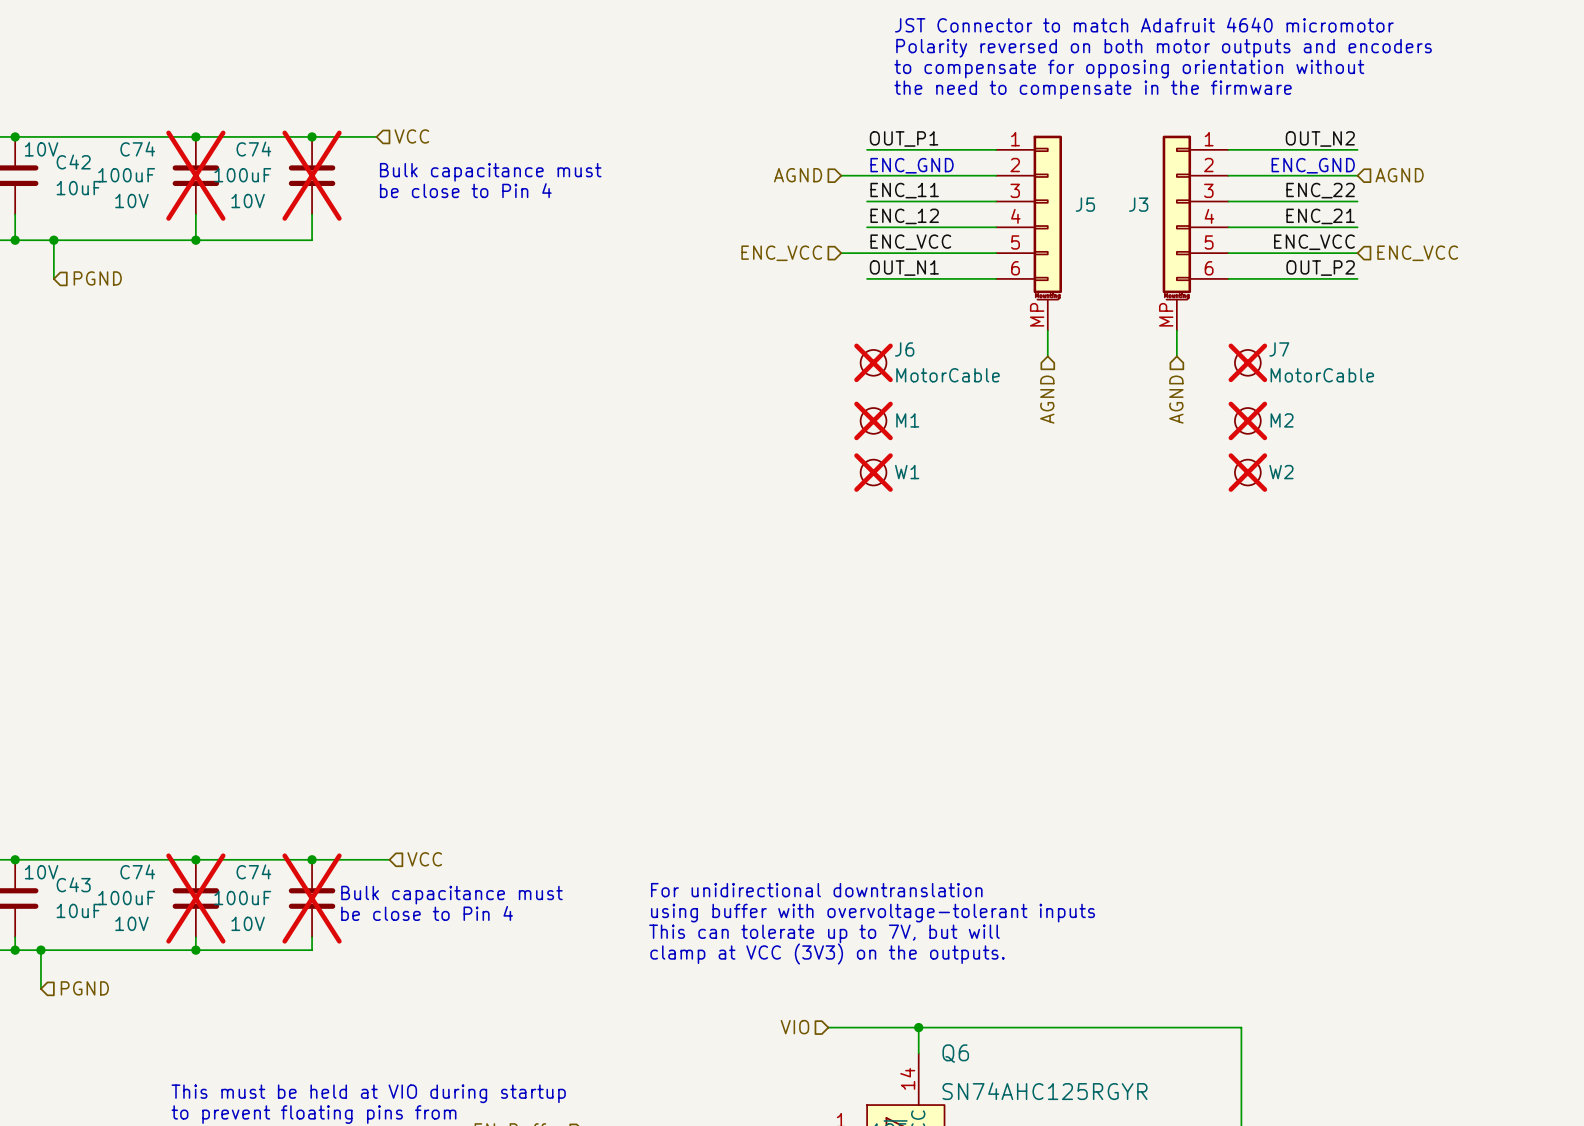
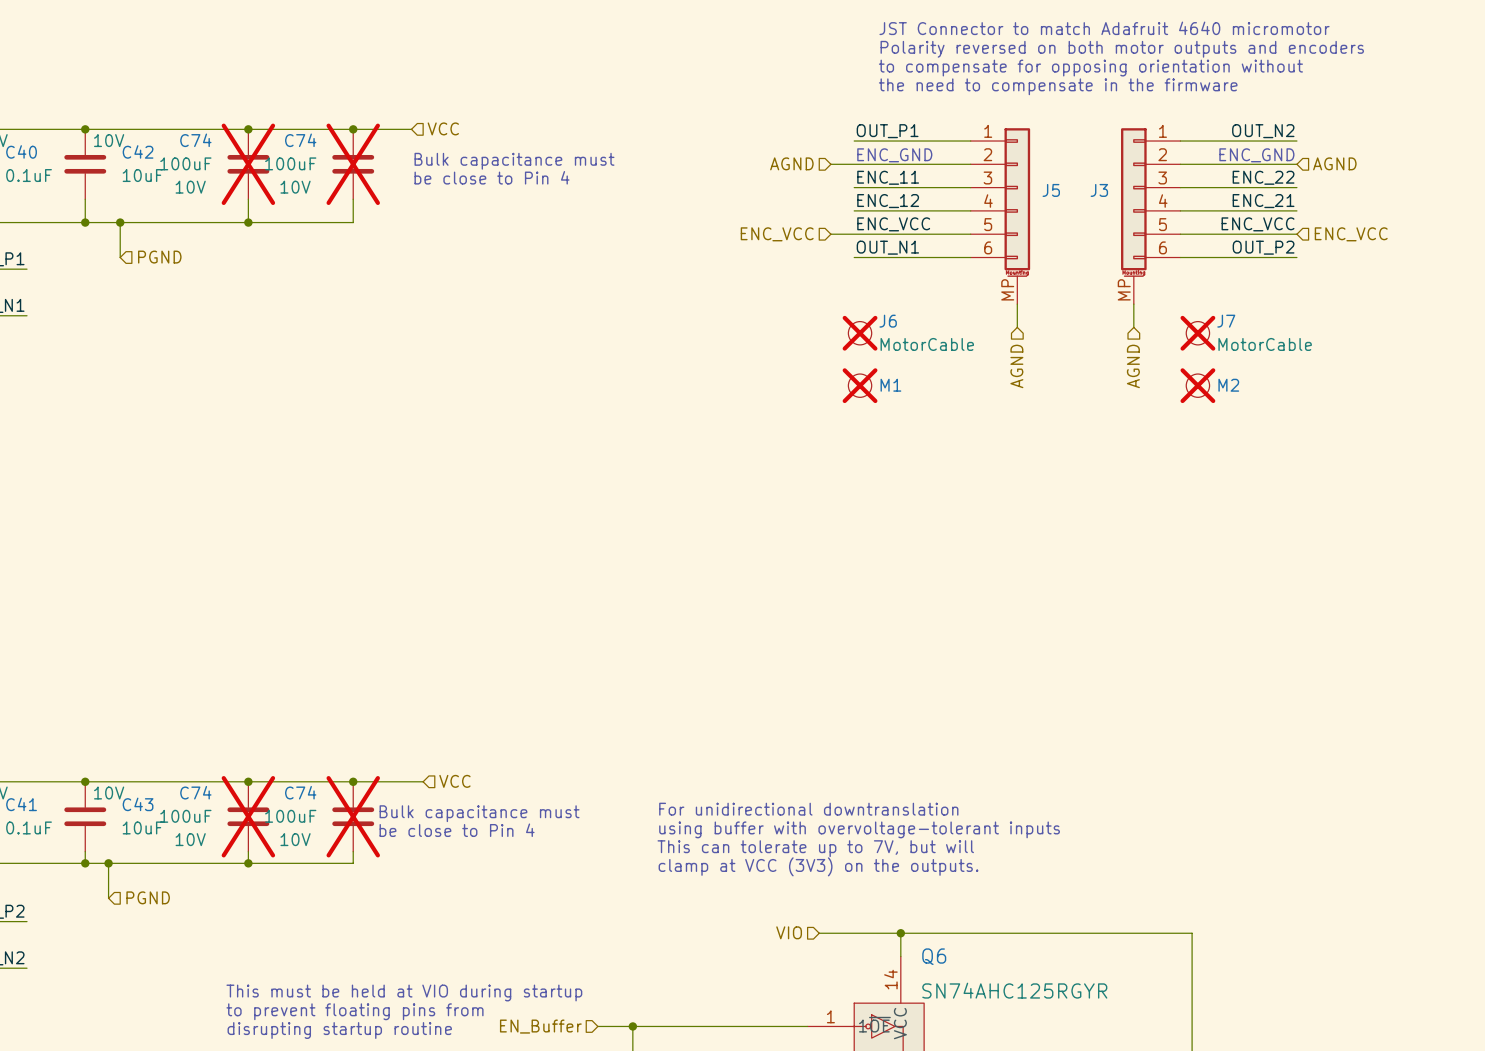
W1: (873, 472) -> none
W2: (1247, 472) -> none

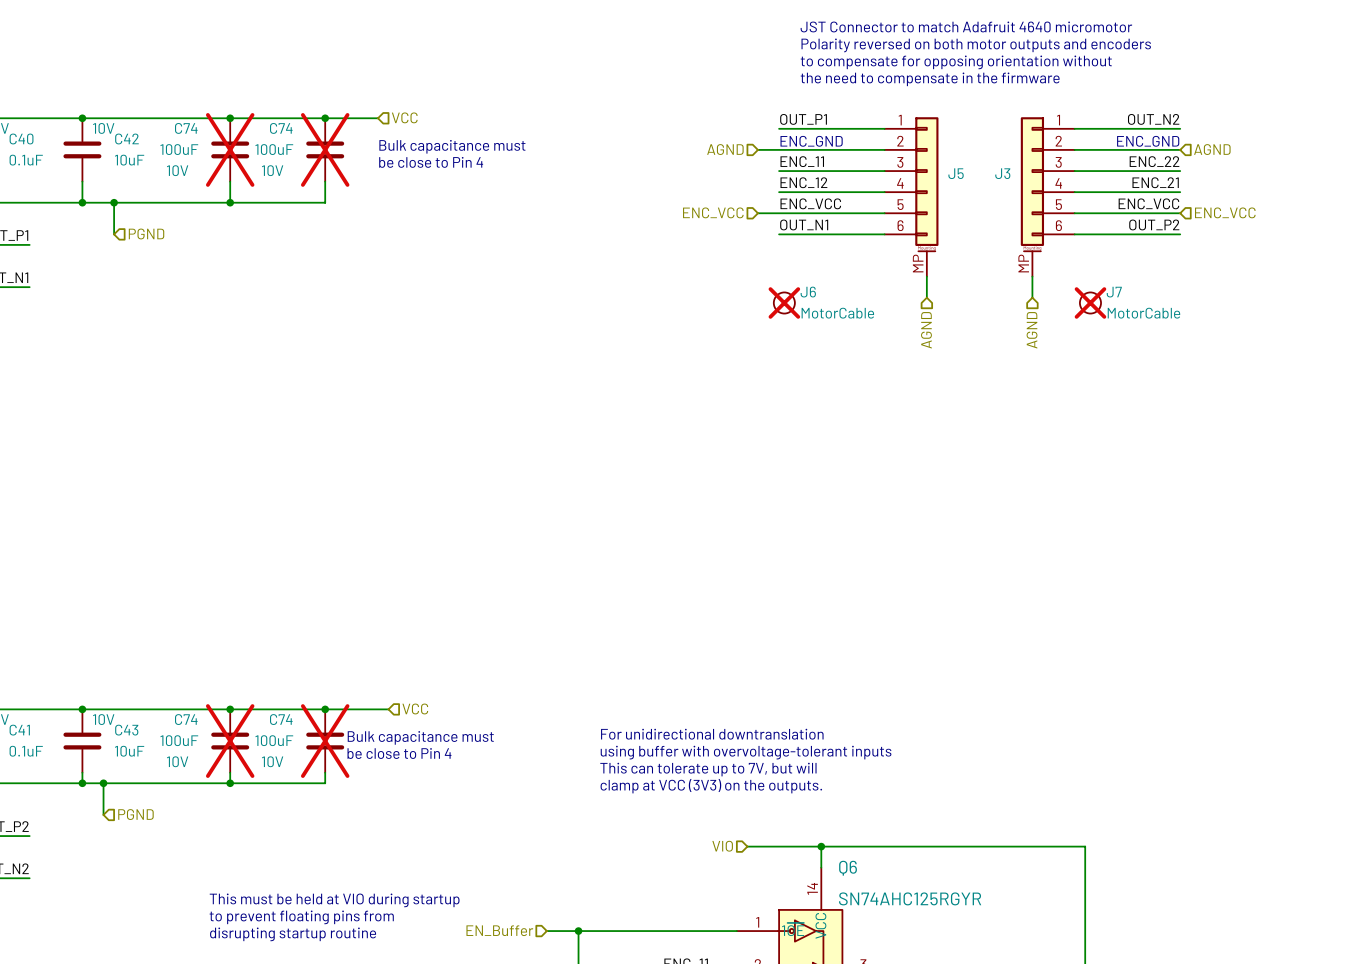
M1: (860, 385) -> none
M2: (1197, 385) -> none

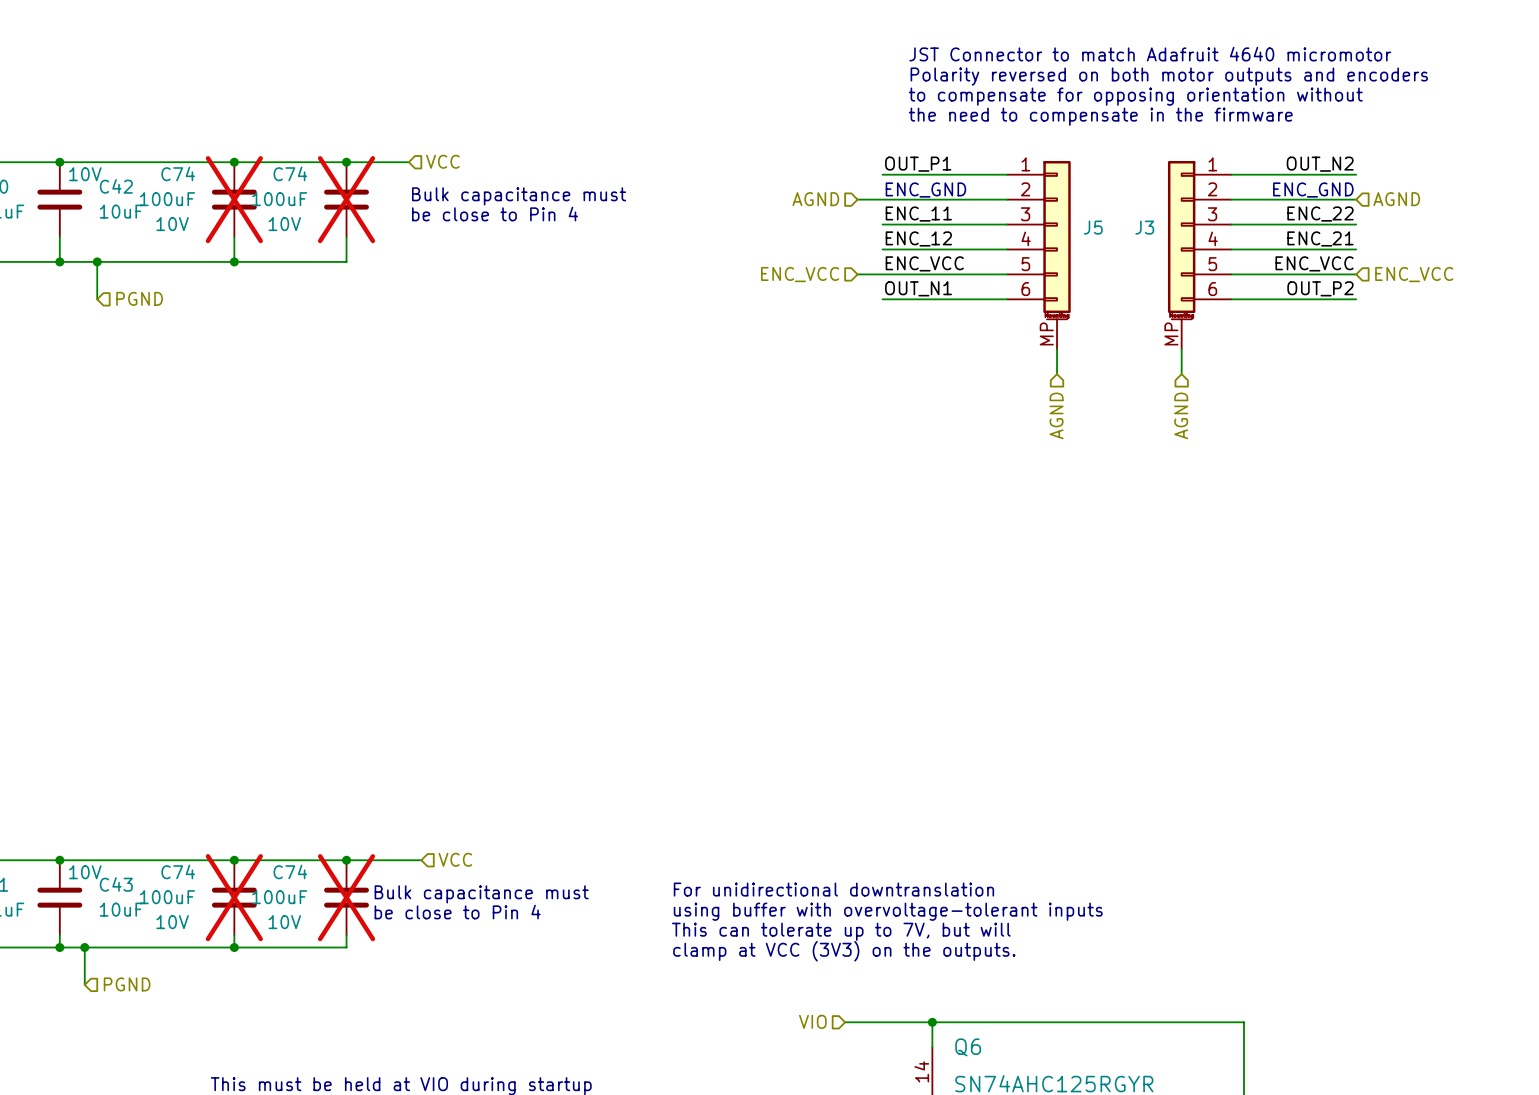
J6: MotorCable (784, 302) -> none
J7: MotorCable (1090, 302) -> none

